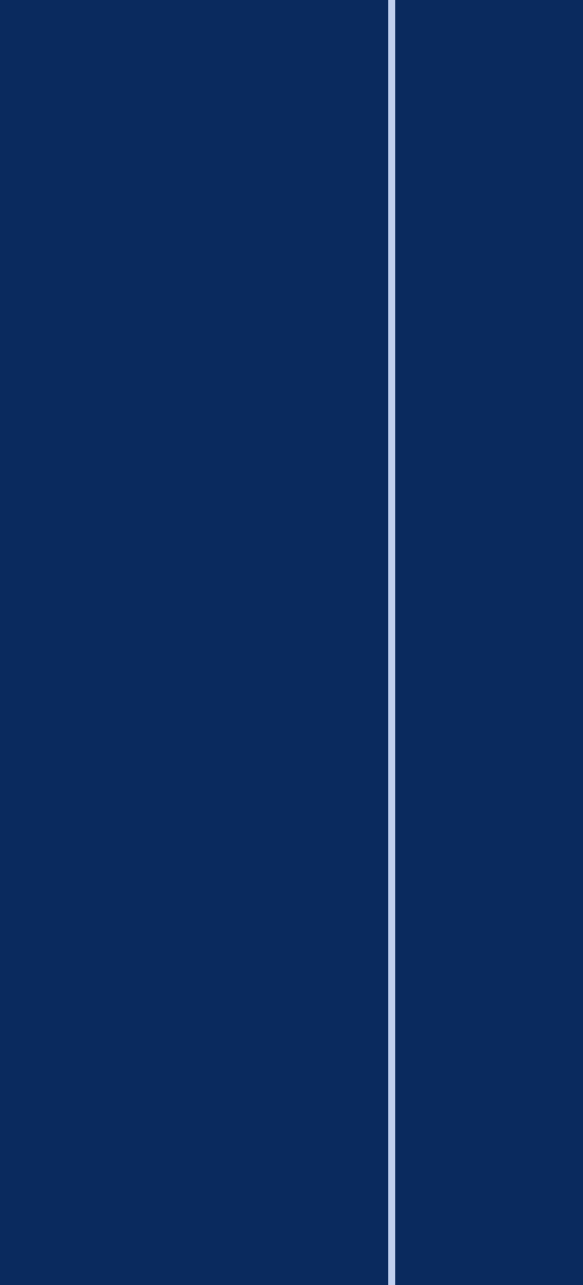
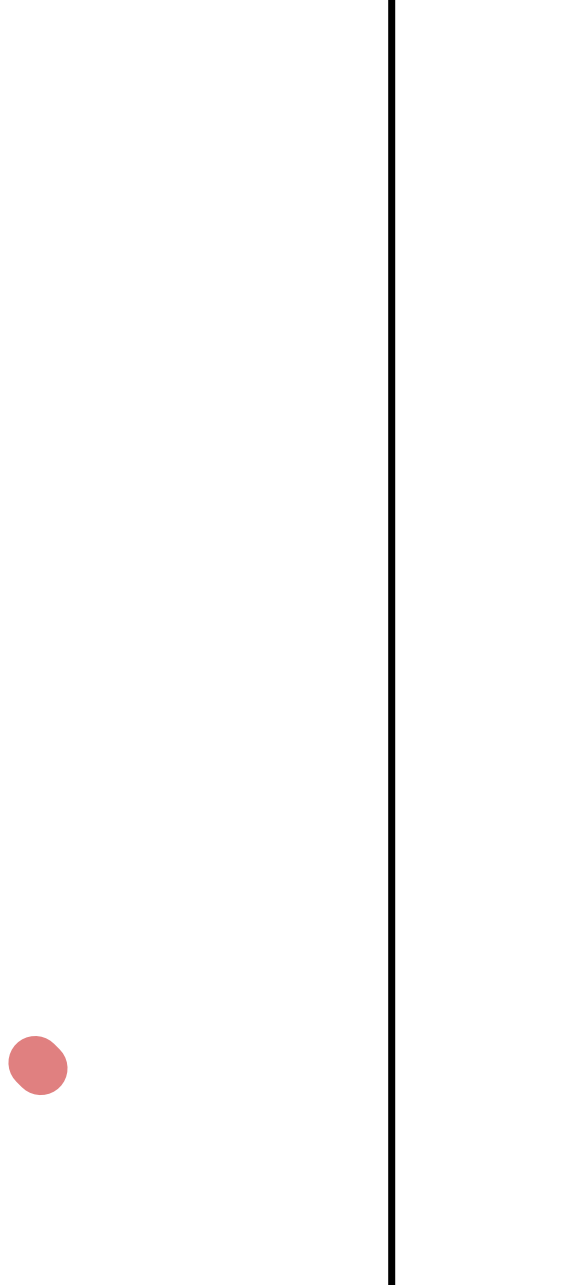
track: none -> (35, 1062) (40, 1068)

